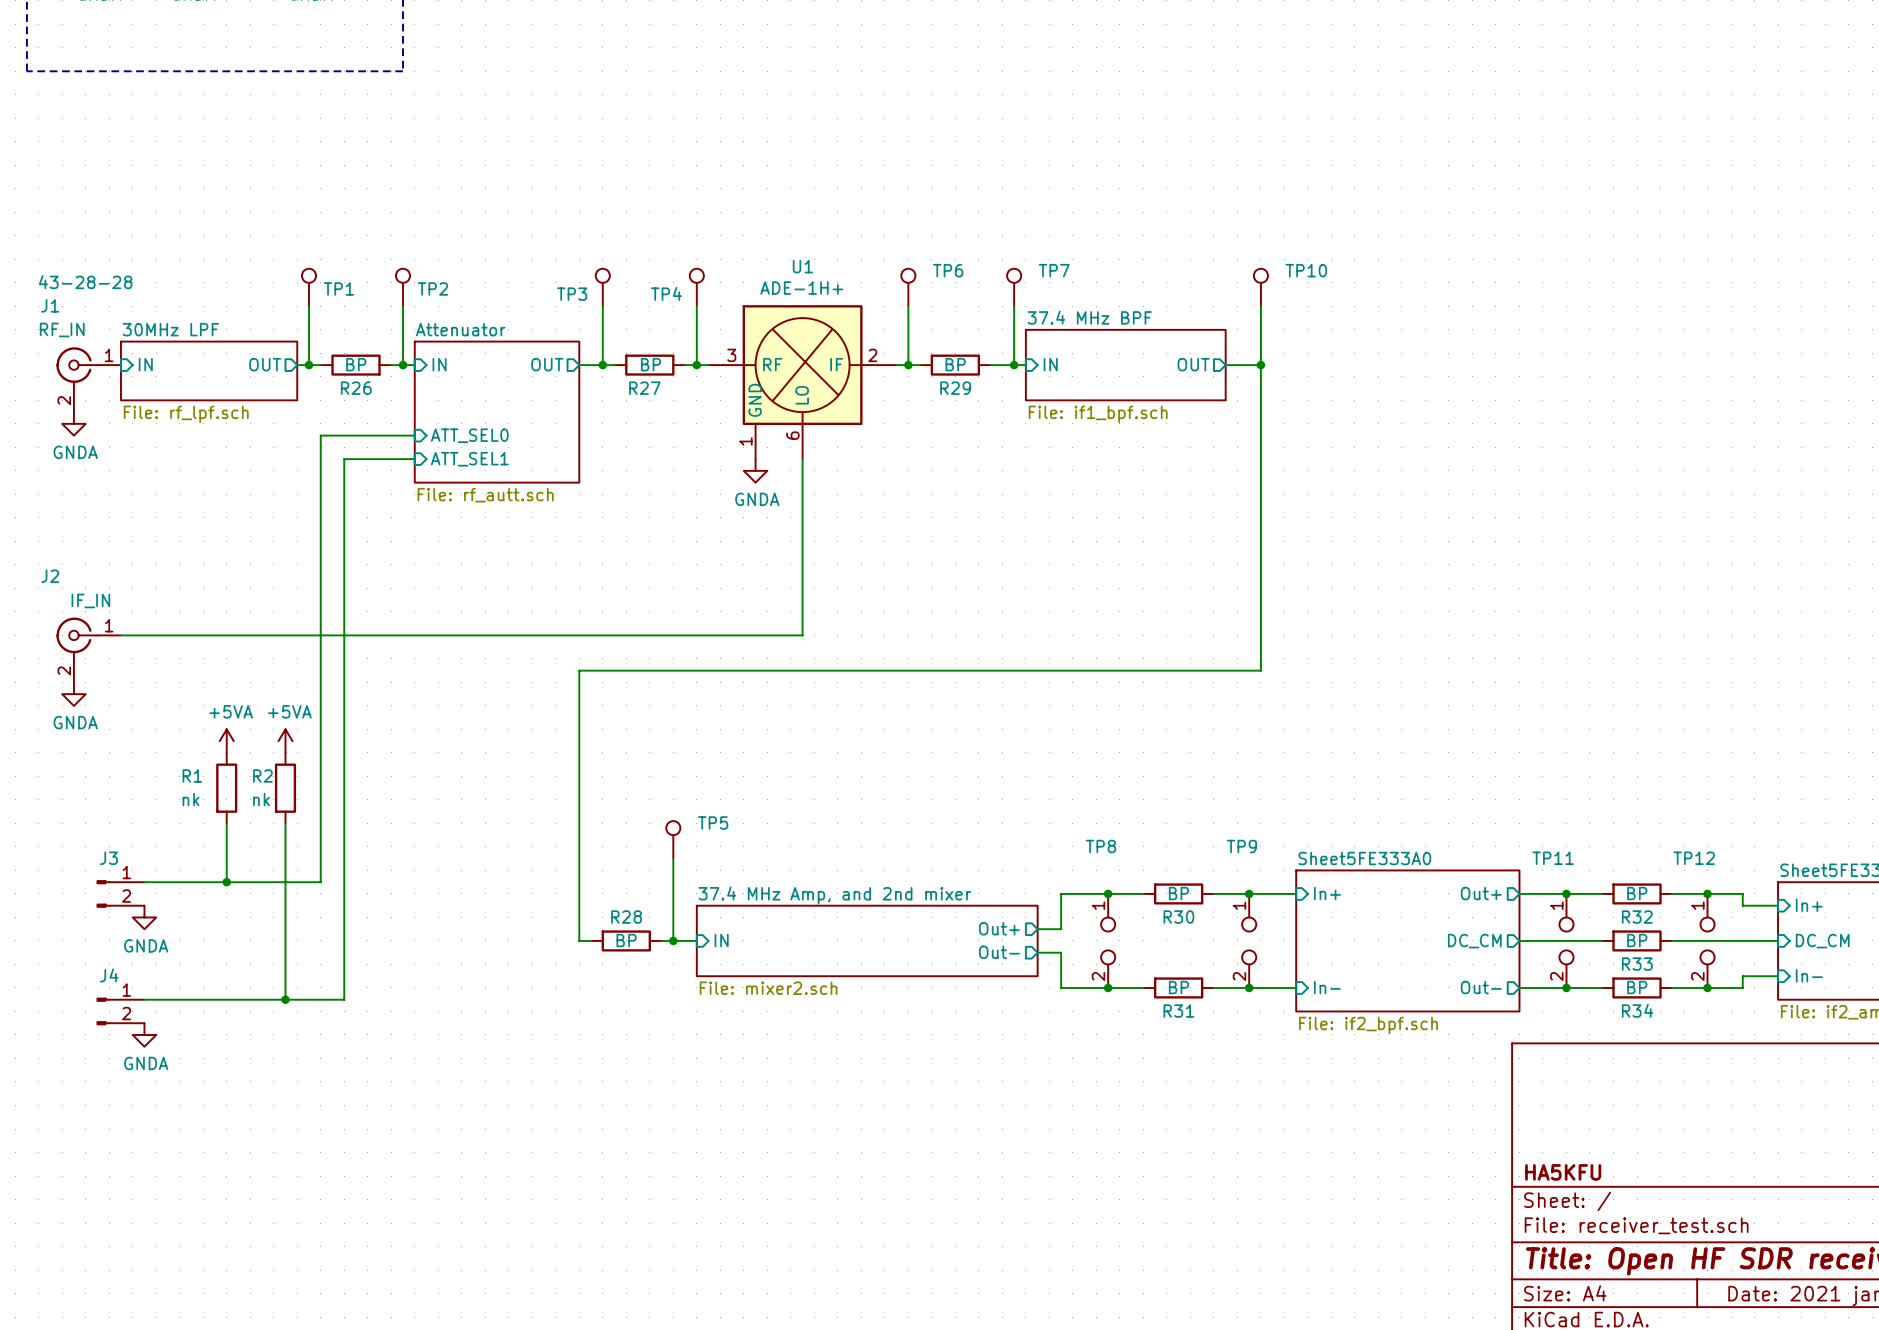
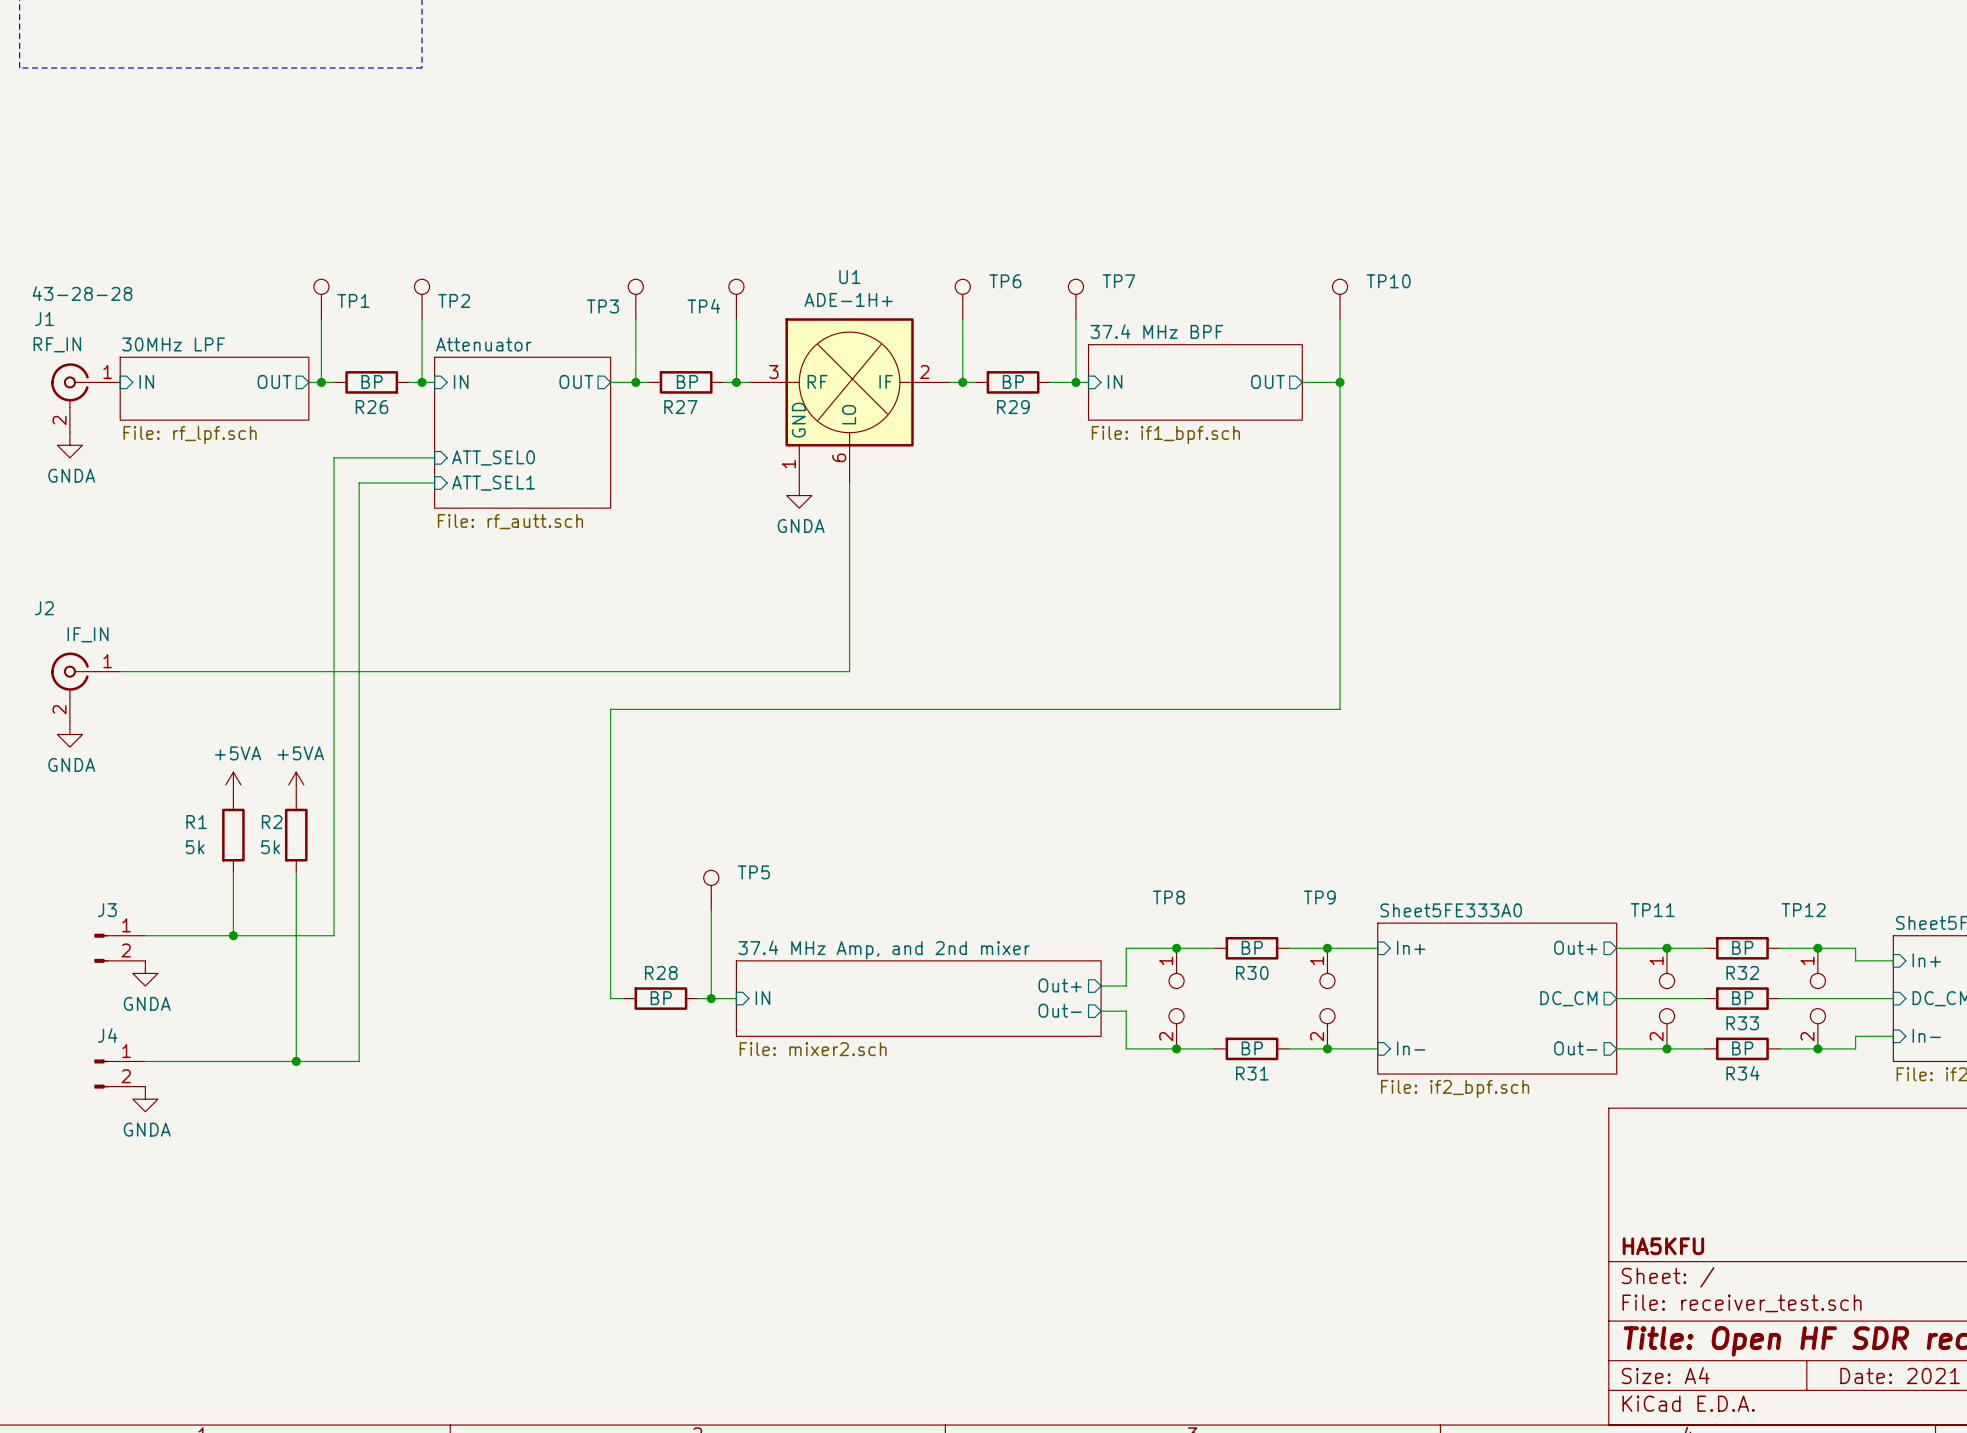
R1 value: nk (191, 799) -> 5k (195, 847)
R2 value: nk (261, 799) -> 5k (270, 847)

